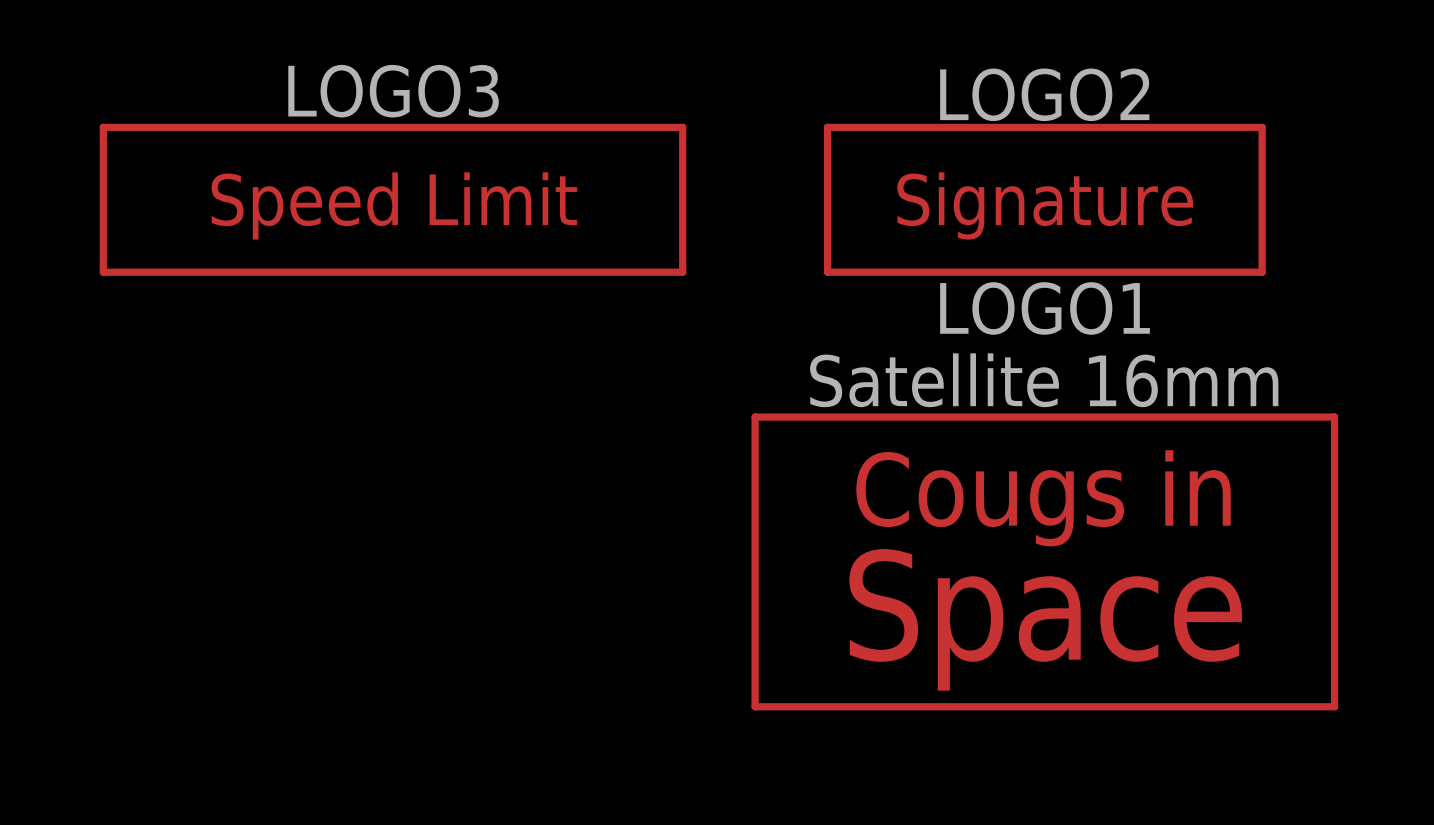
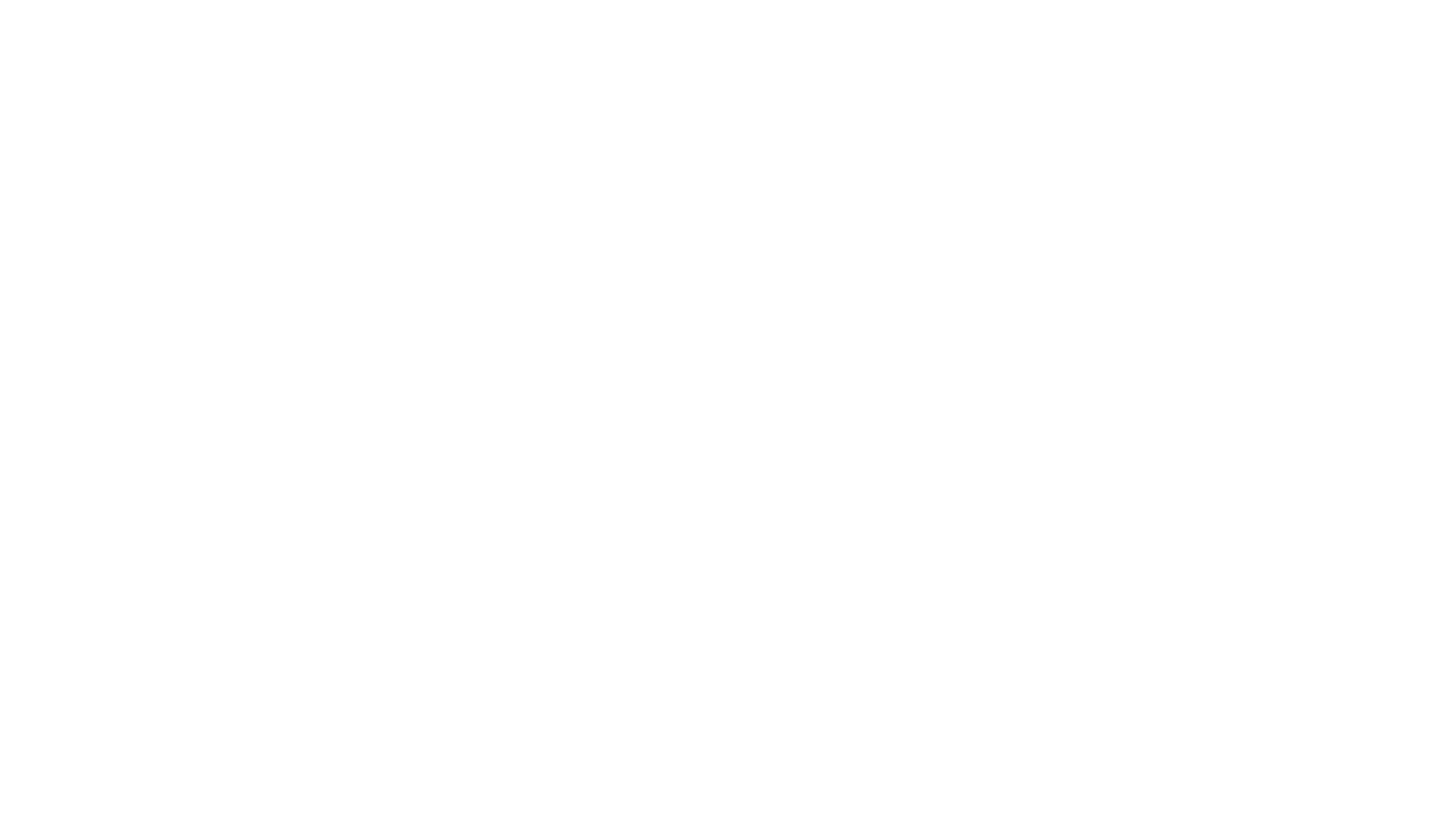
LOGO3: Speed Limit (393, 199) -> none
LOGO2: (1044, 199) -> none
LOGO1: Satellite 16mm (1044, 561) -> none

